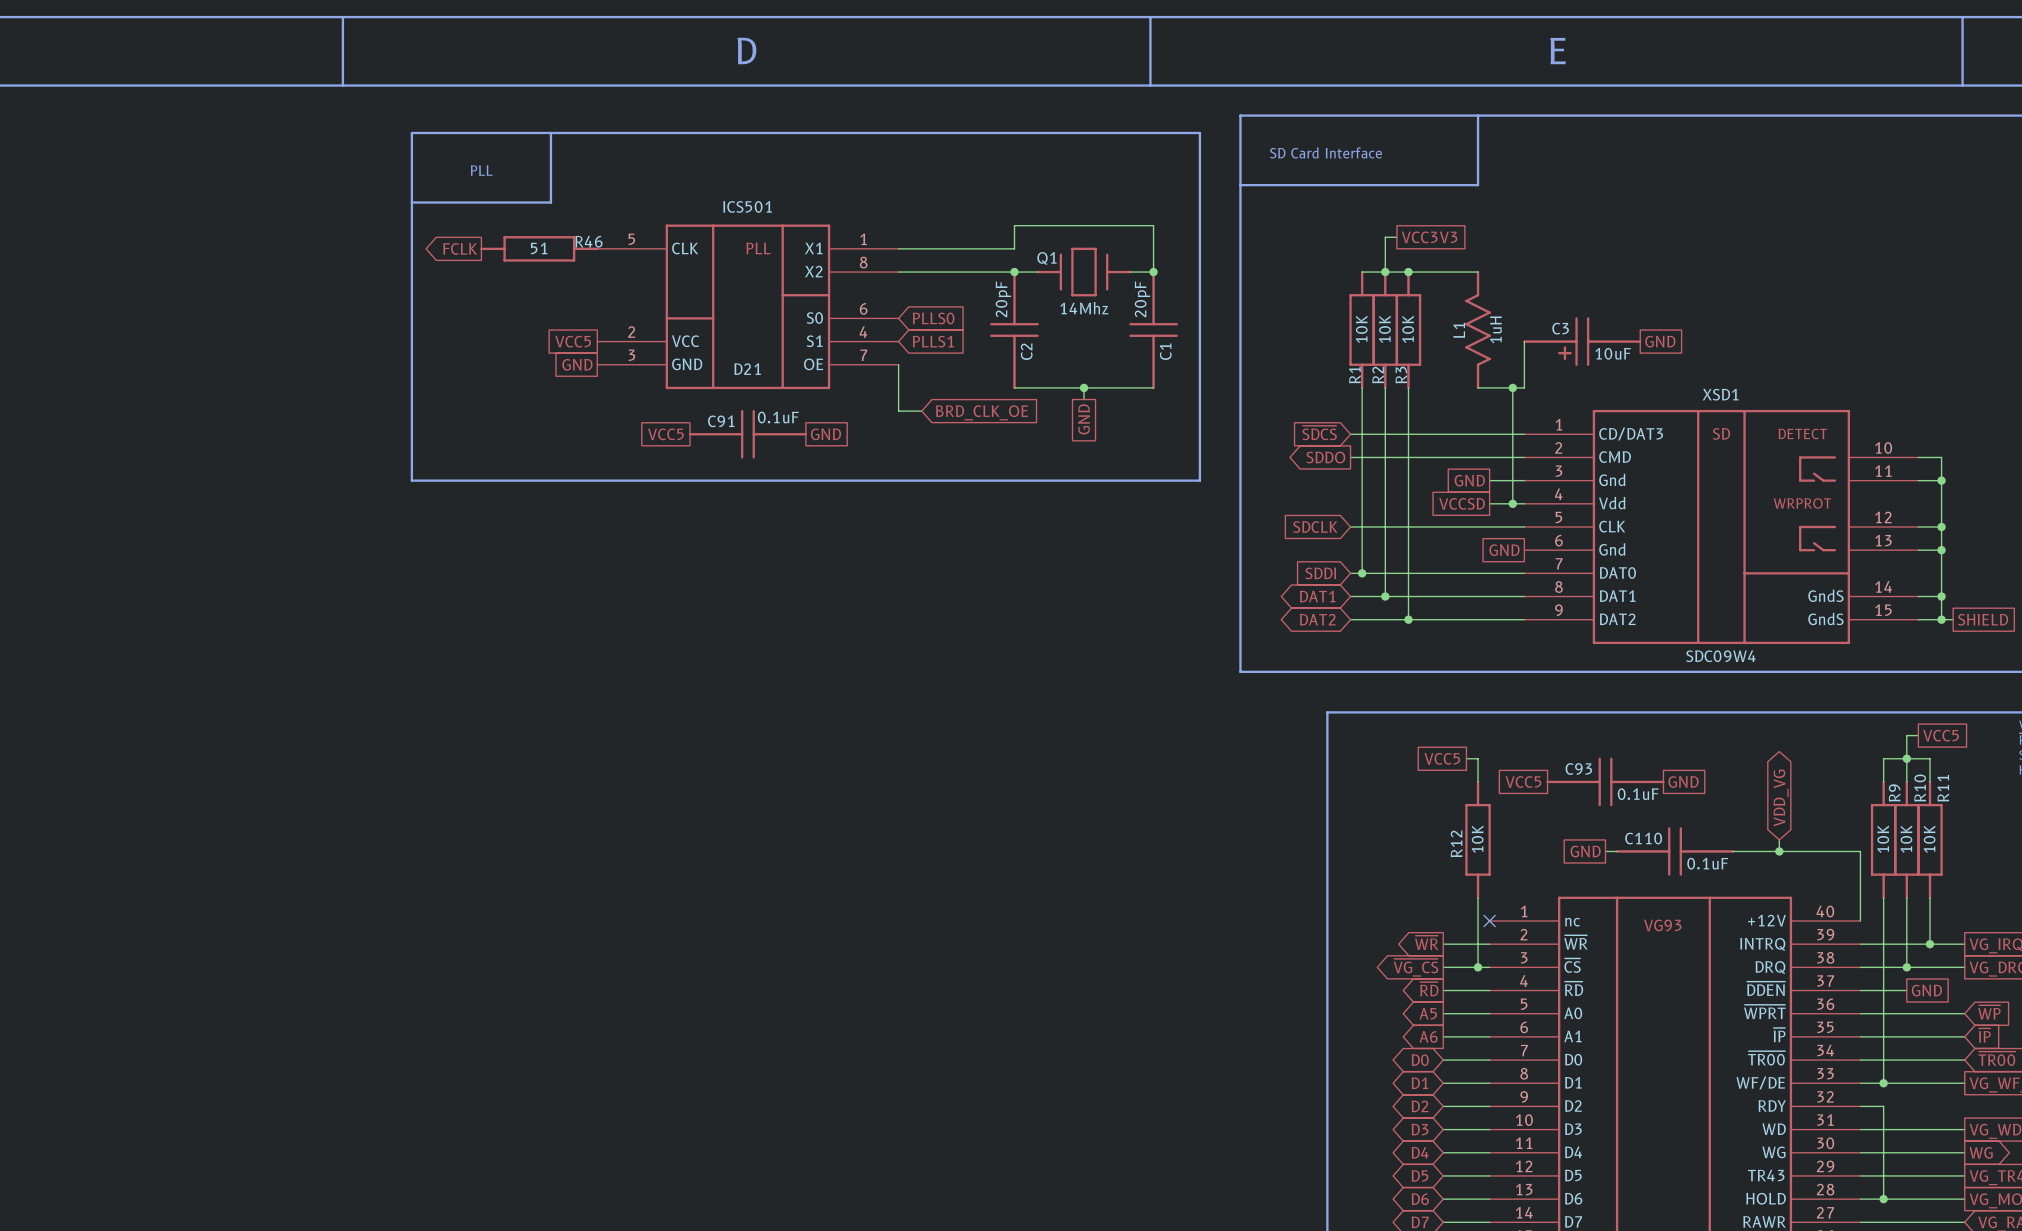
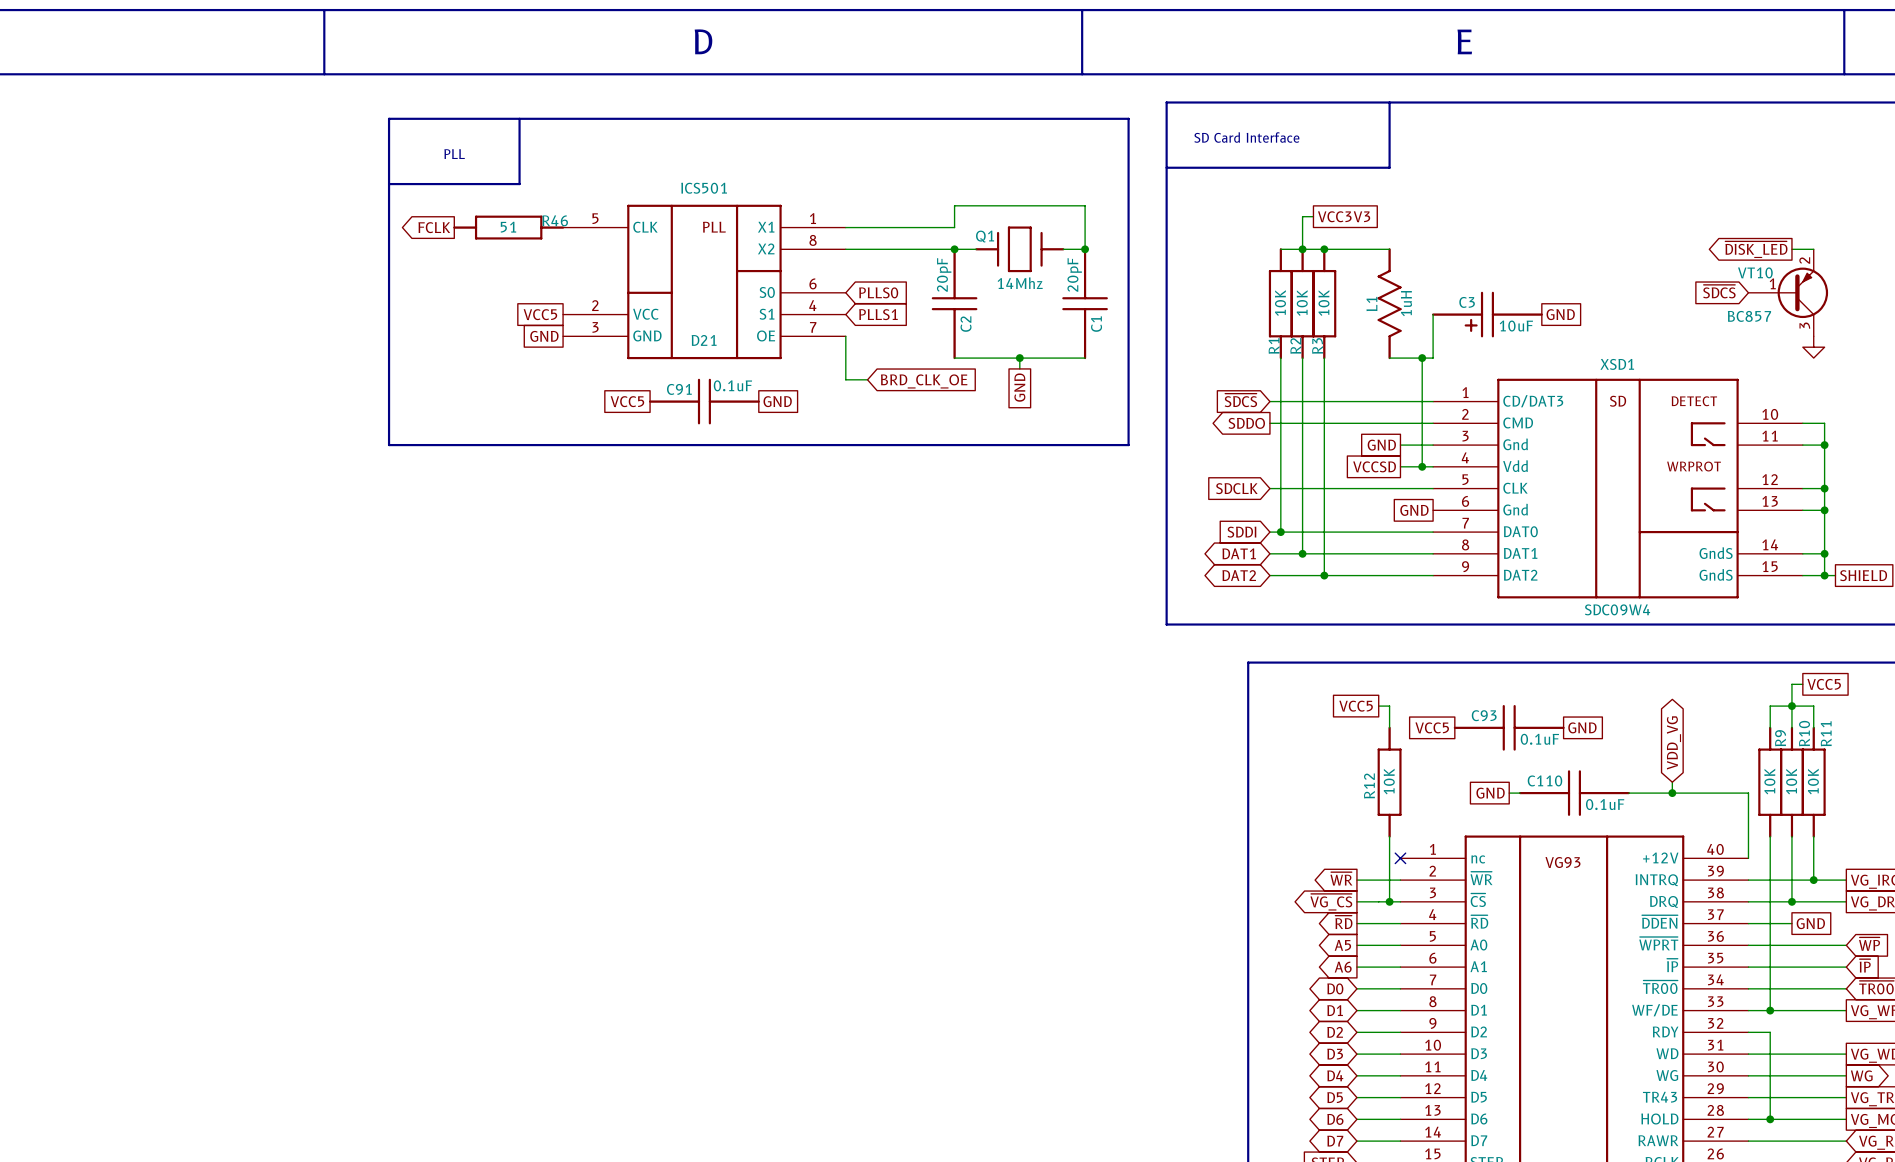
global label: none -> ~{DISK_LED} (1756, 249)
wire: none -> (1791, 249) (1813, 249)
global label: none -> ~{SDCS} (1719, 291)
VT10: none -> BC857 (1788, 292)
power symbol: none -> (1813, 347)

